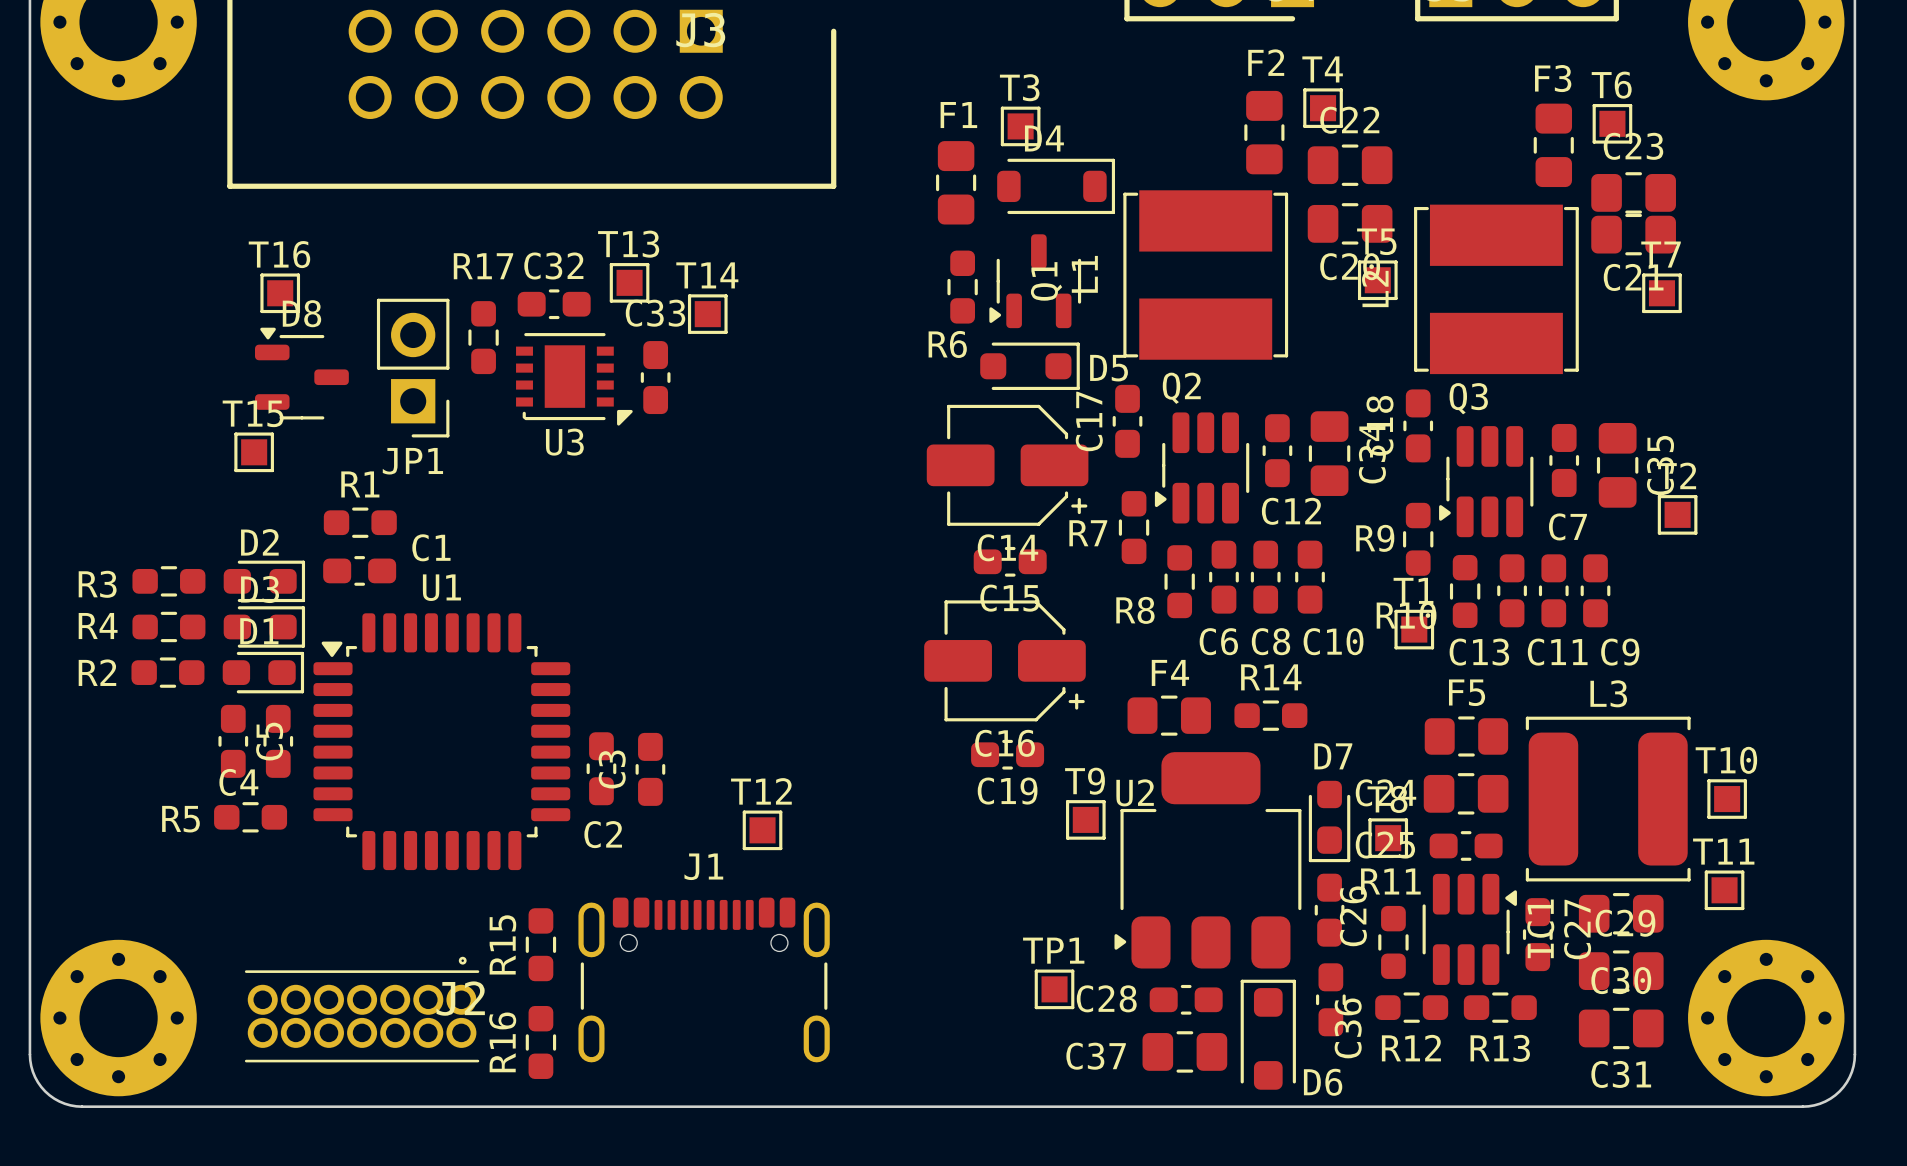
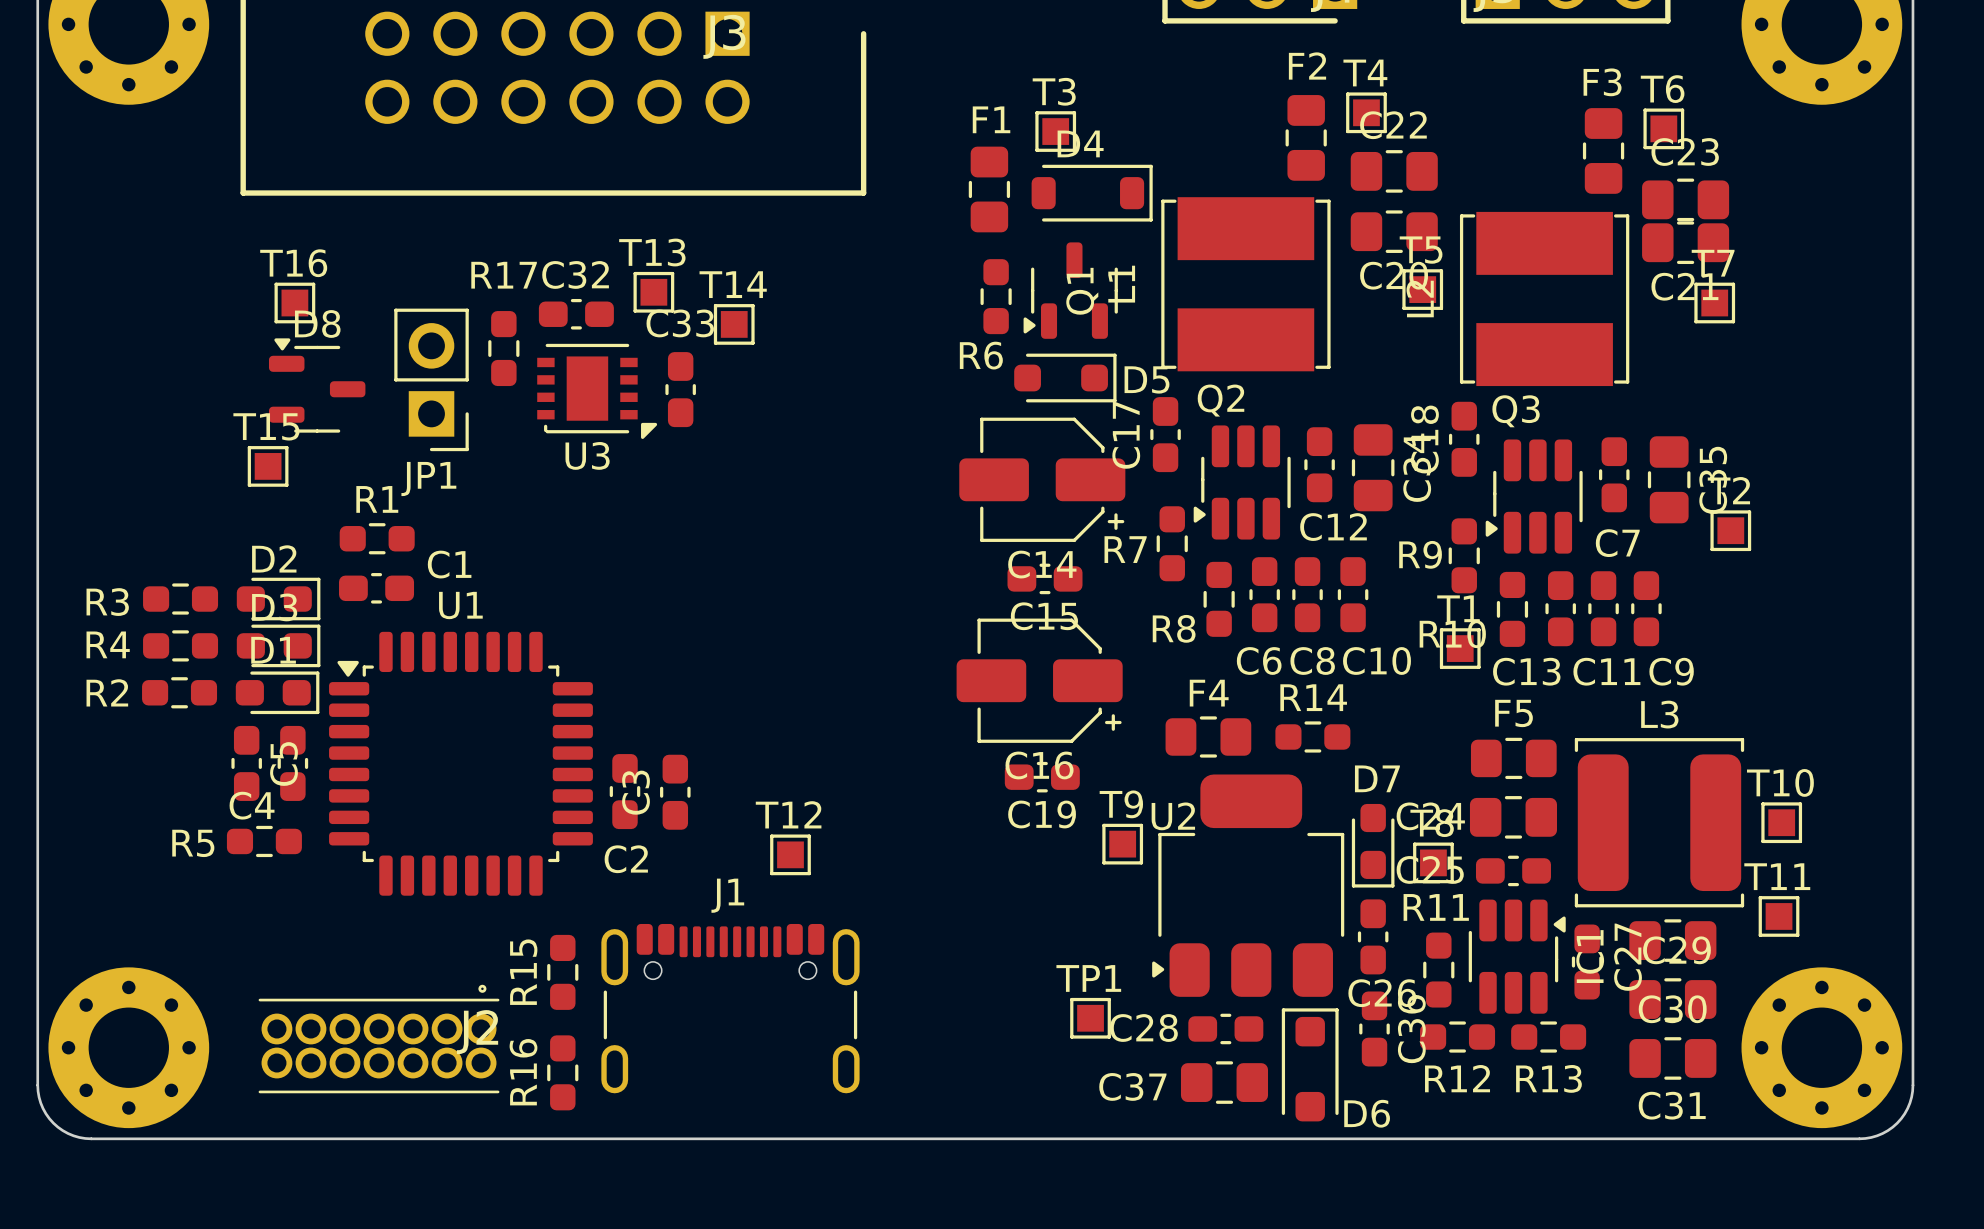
C26 name rotation: 0° (1353, 916) -> 90° clockwise (1382, 993)
C36 name position: C36 (1348, 1028) -> C36 (1411, 1029)

